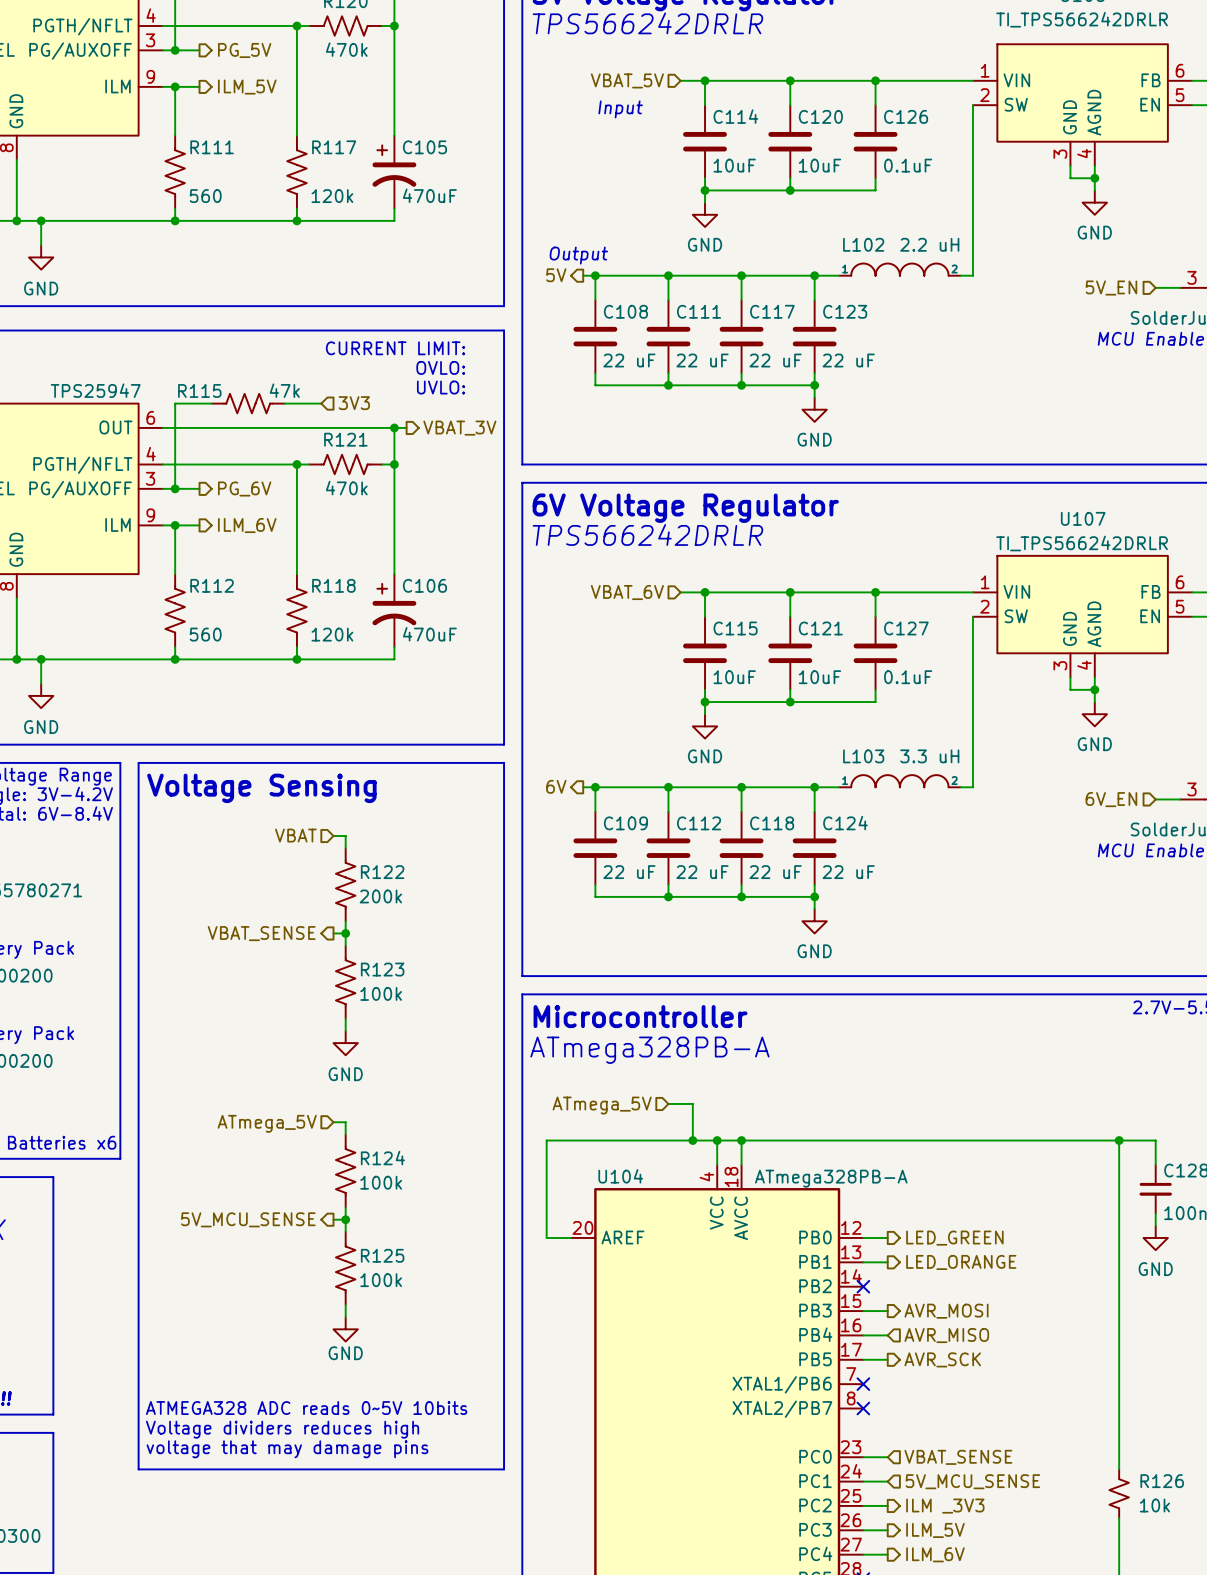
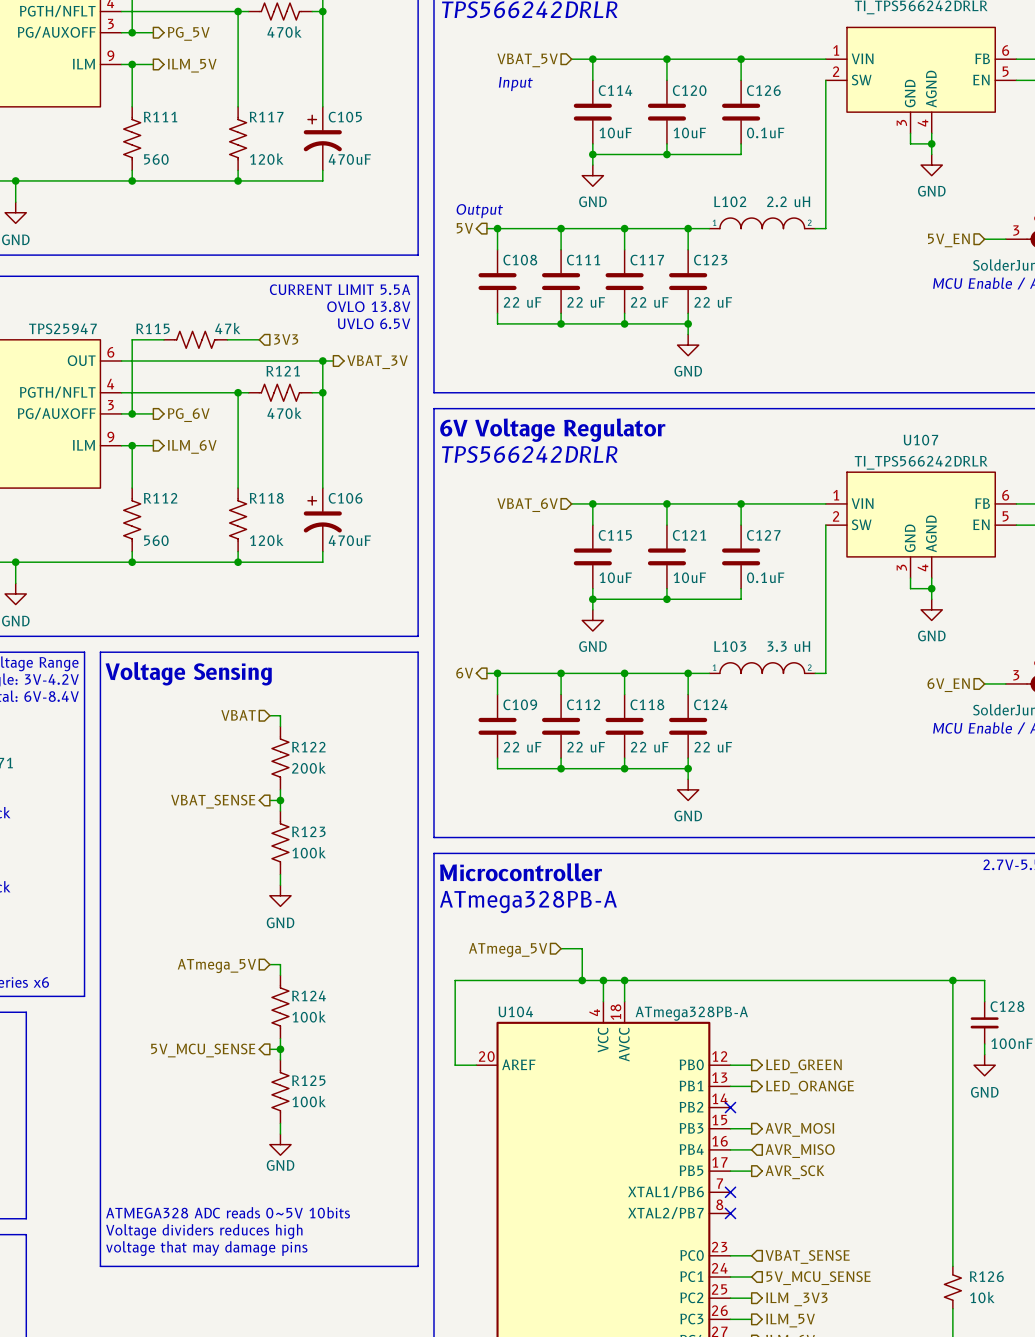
text: CURRENT LIMIT: (395, 348) -> CURRENT LIMIT 5.5A (340, 289)
text: none -> OVLO 13.8V (368, 306)
text: OVLO: (440, 367) -> none
text: none -> UVLO 6.5V (374, 323)
text: UVLO: (441, 387) -> none

